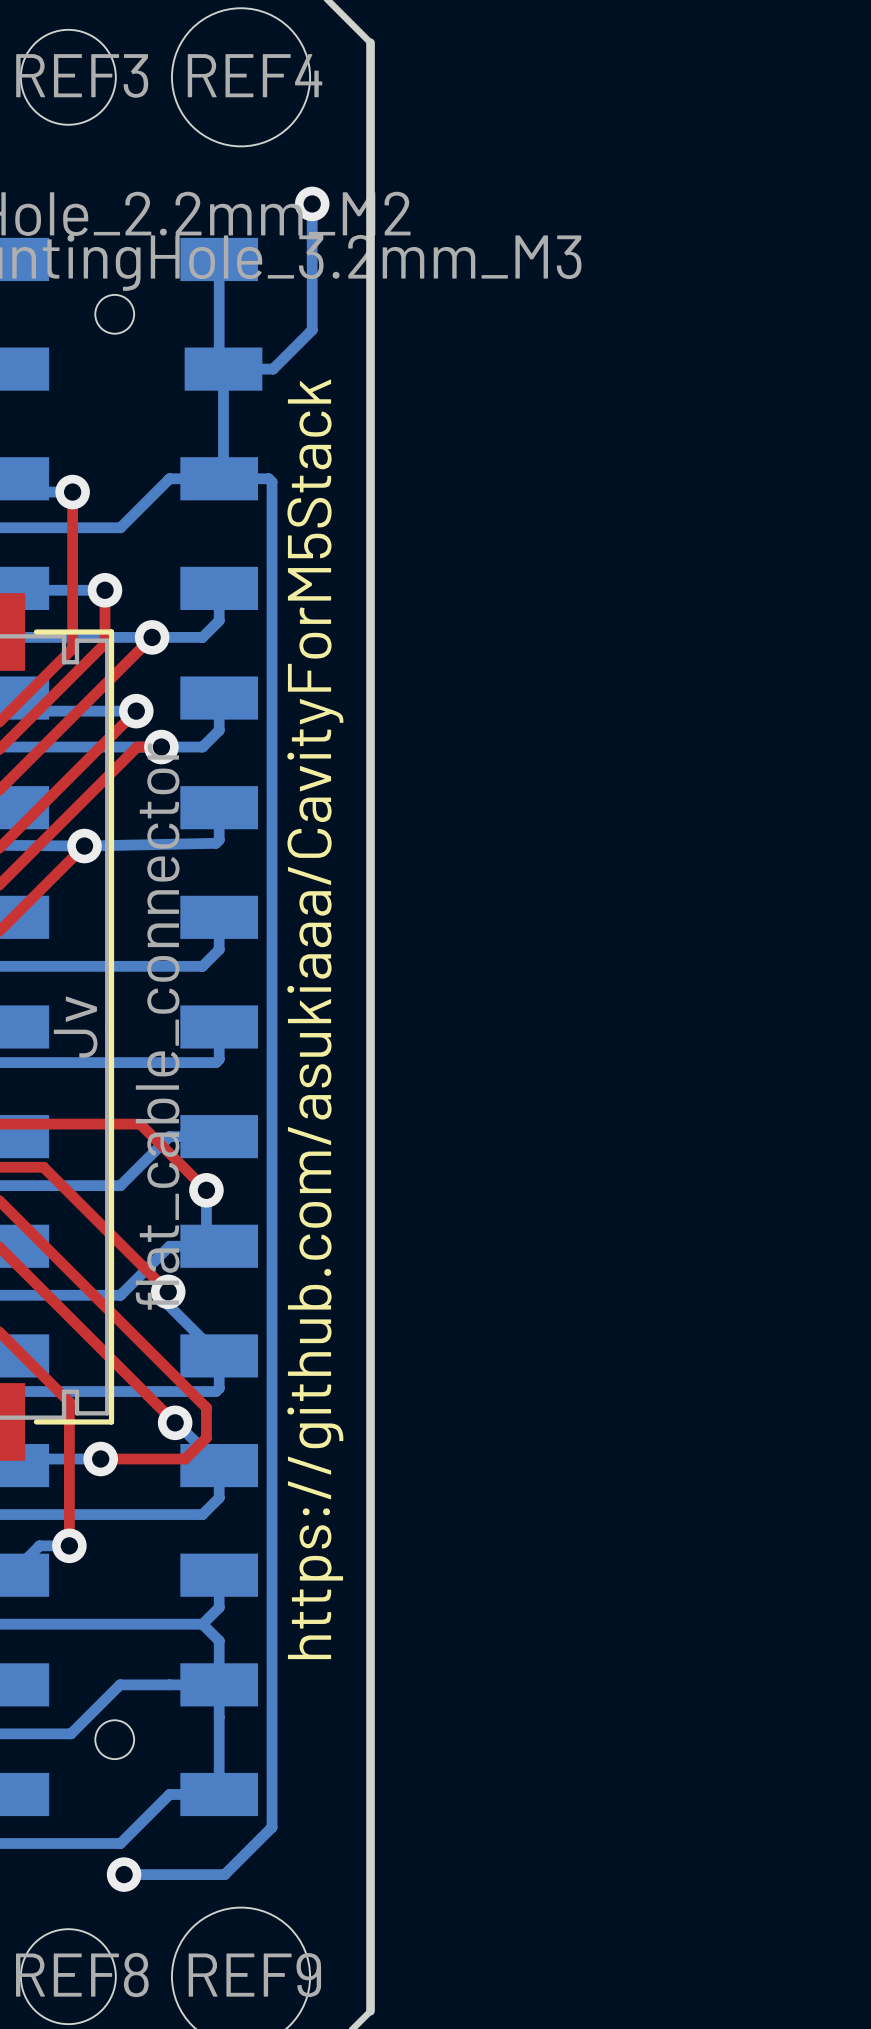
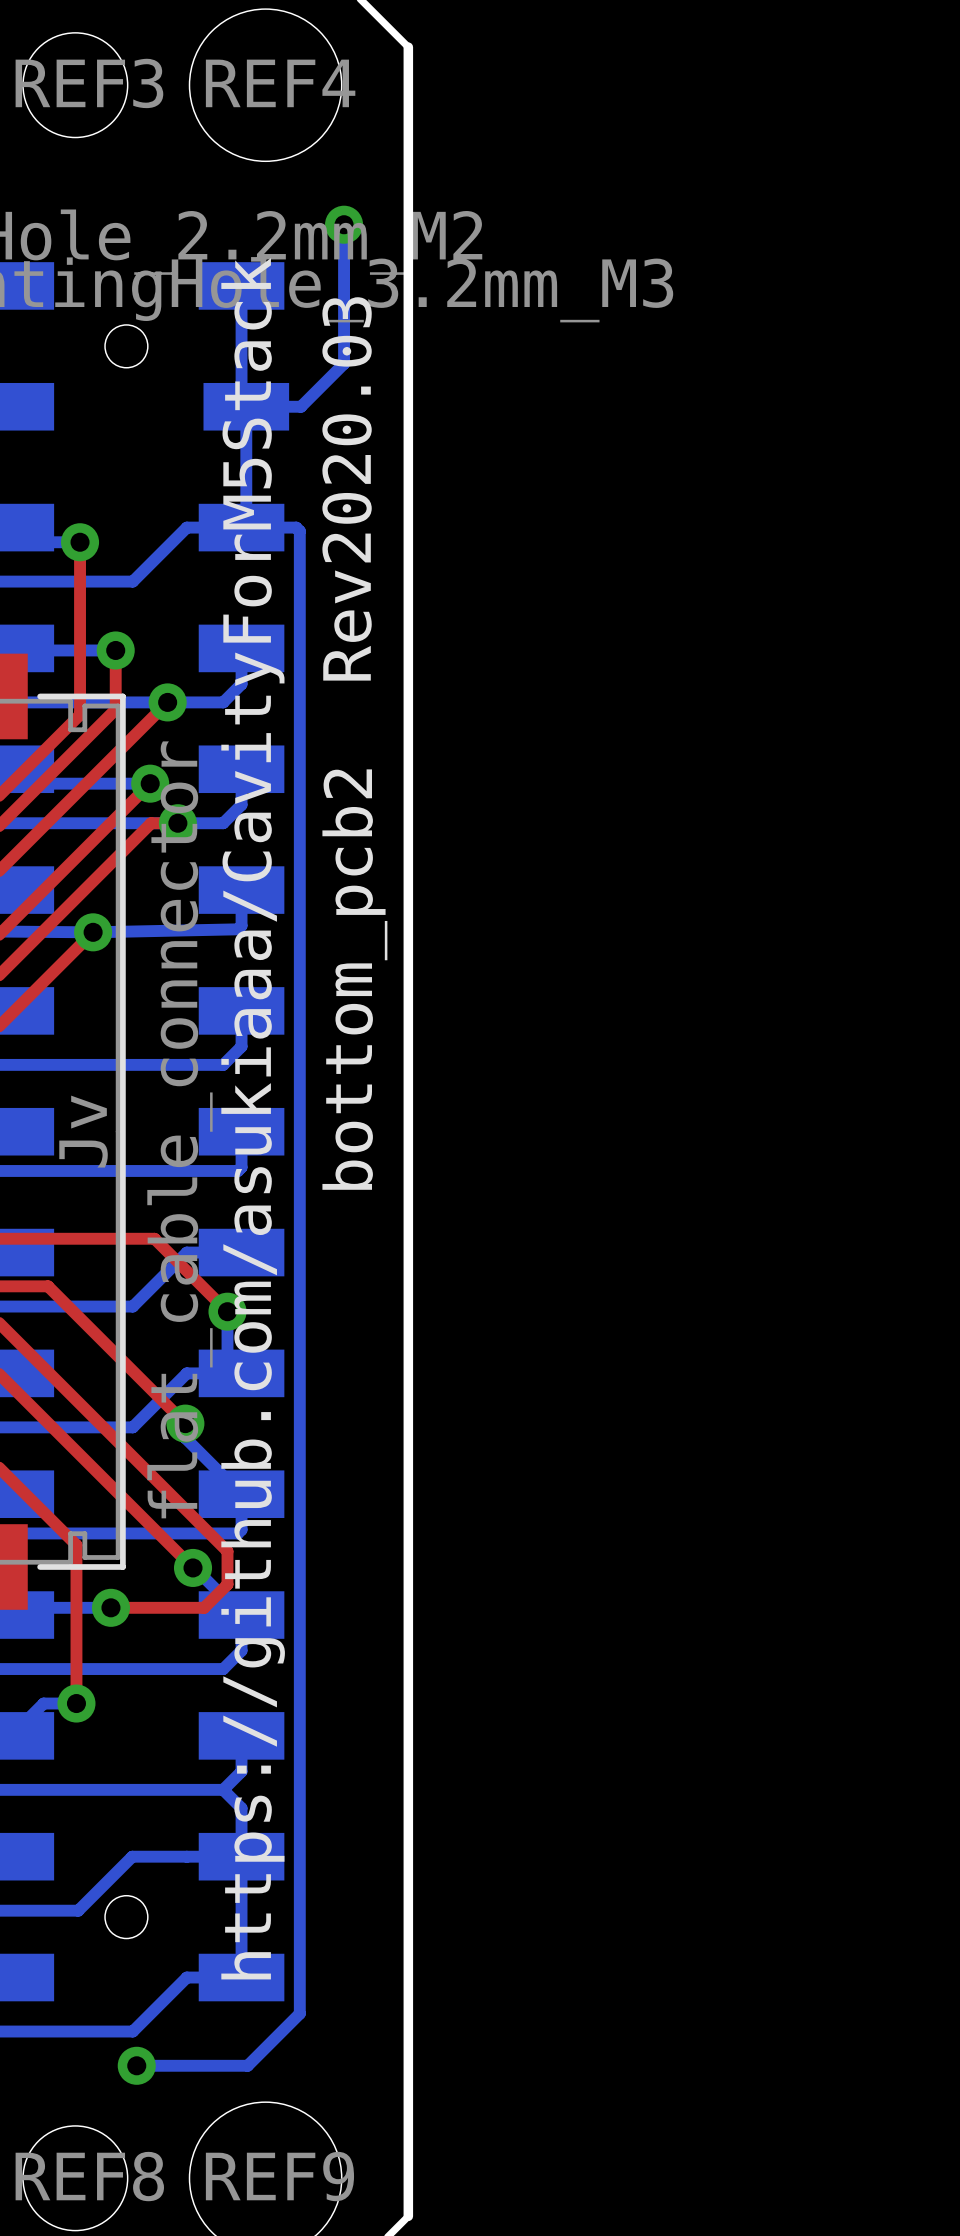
text: none -> Rev2020.03 (347, 488)
text: none -> bottom_pcb2 (354, 979)
text position: https://github.com/asukiaaa/CavityForM5Stack (315, 1019) -> https://github.com/asukiaaa/CavityForM5Stack (253, 1118)

